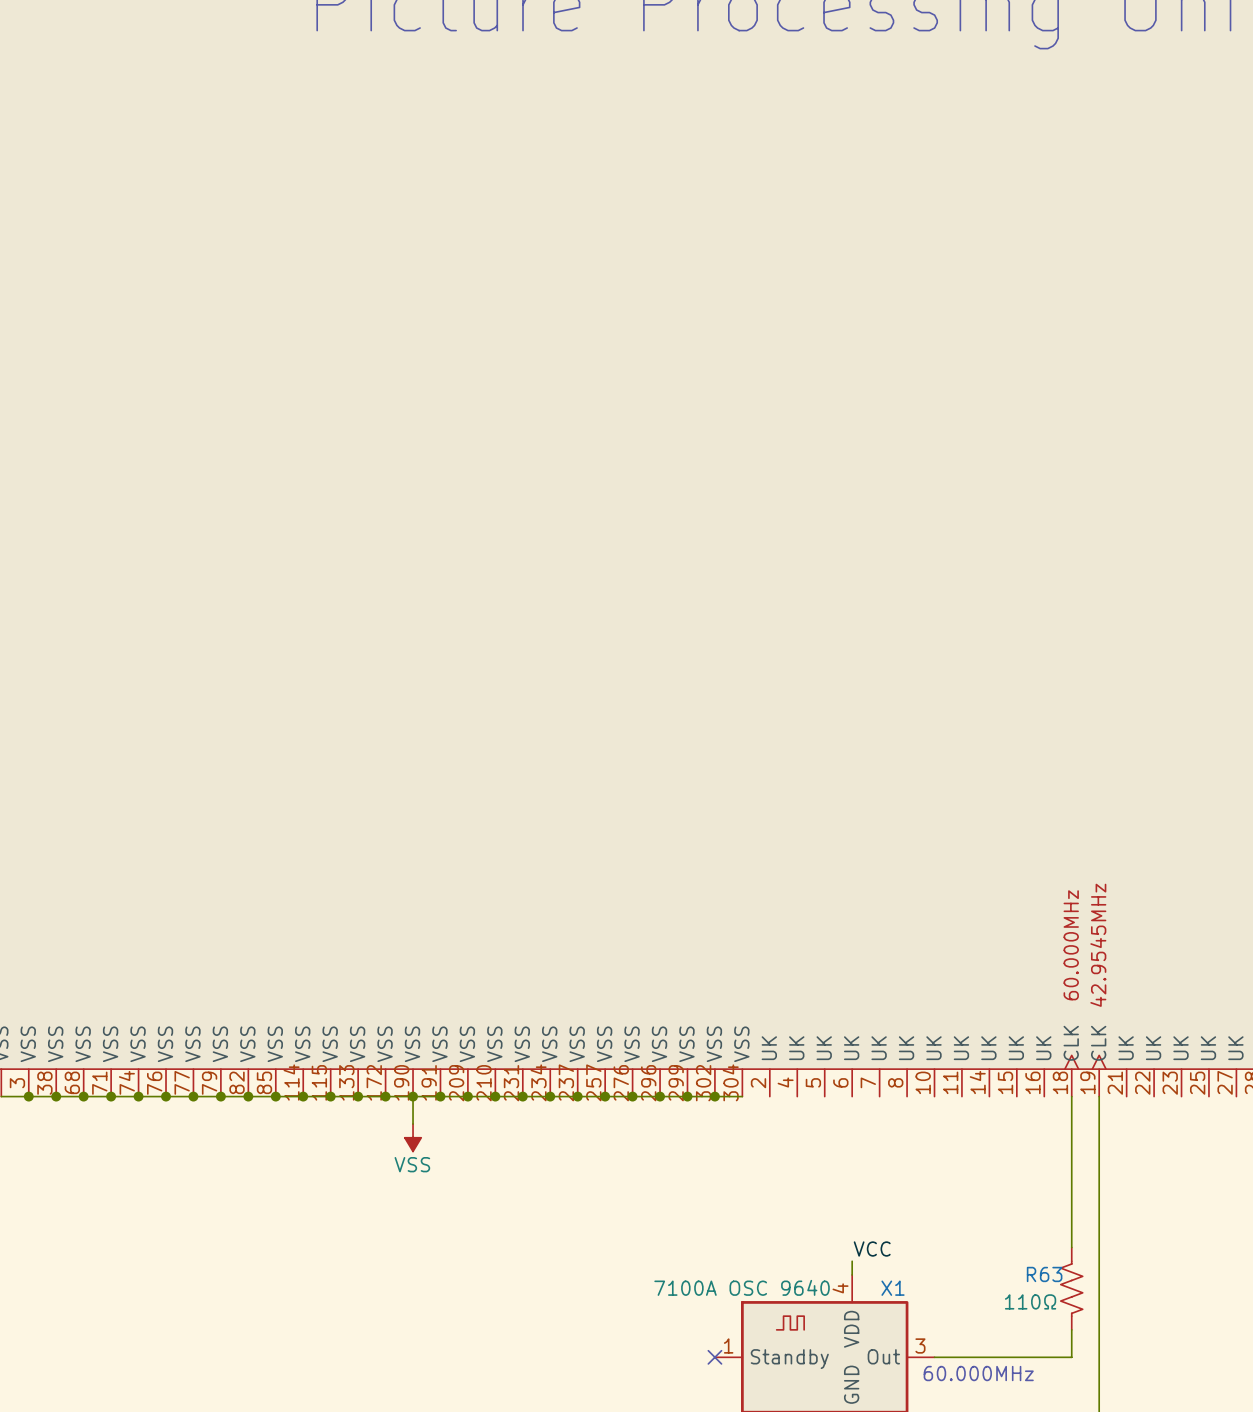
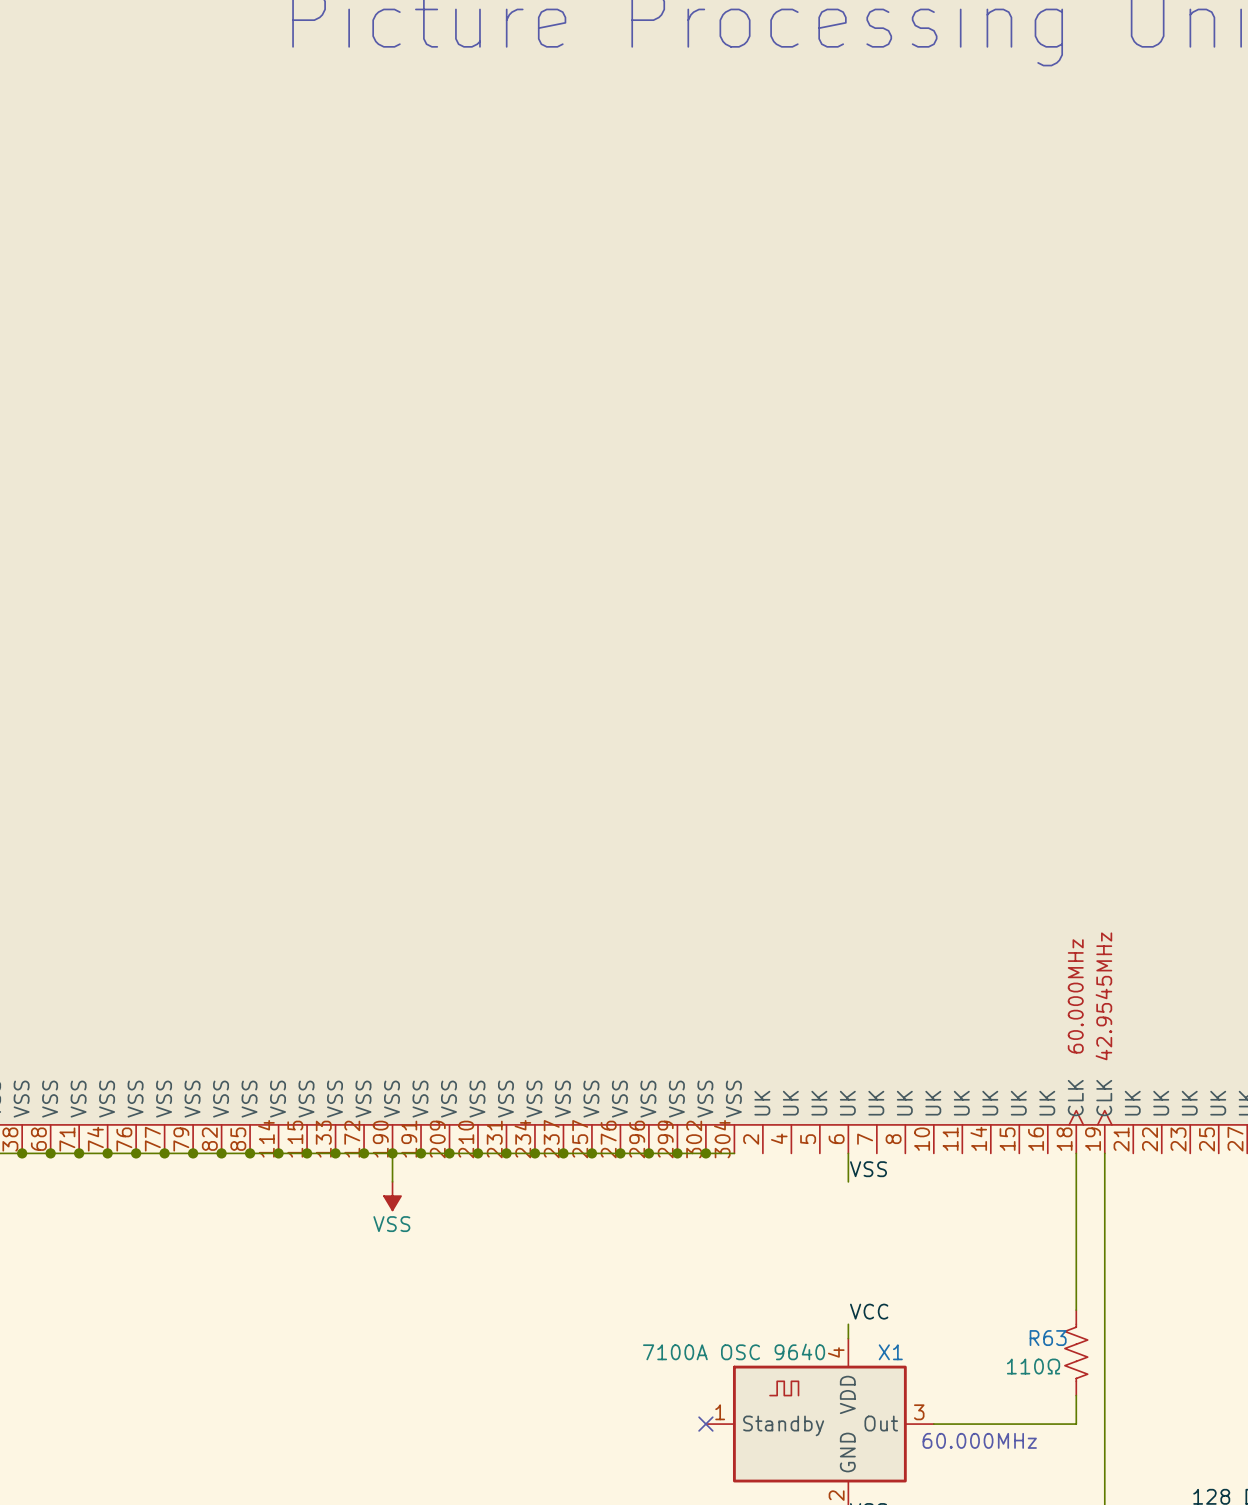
wire: none -> (848, 1153) (848, 1181)
label: none -> VSS (868, 1169)

